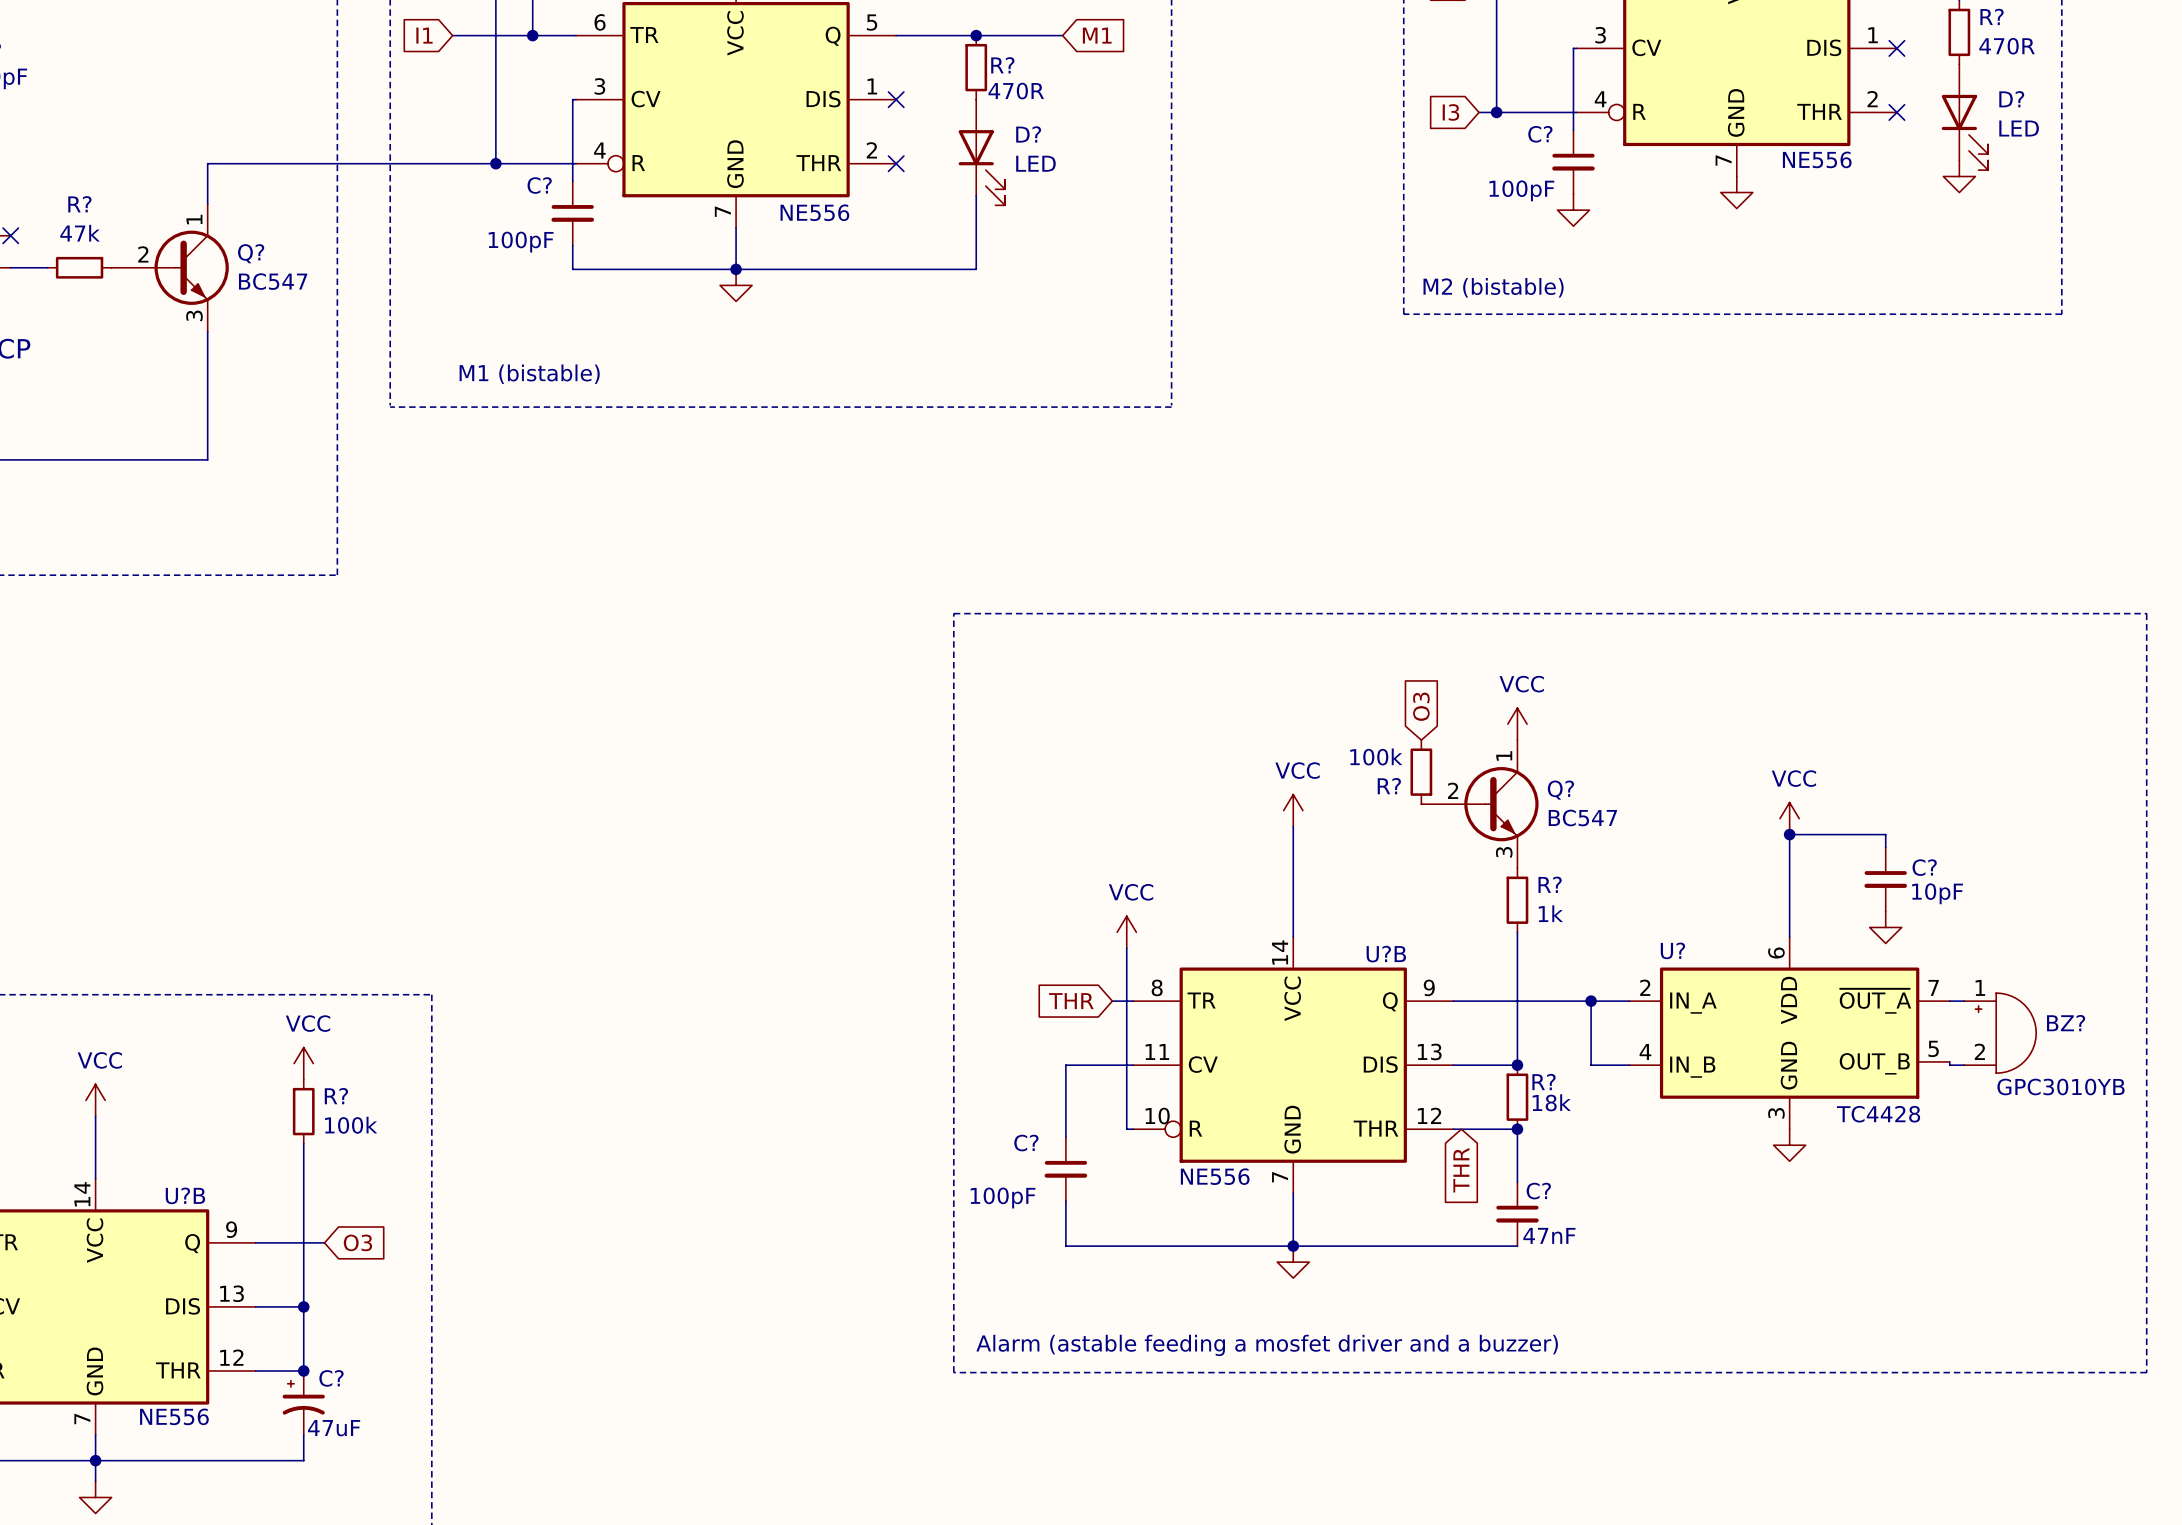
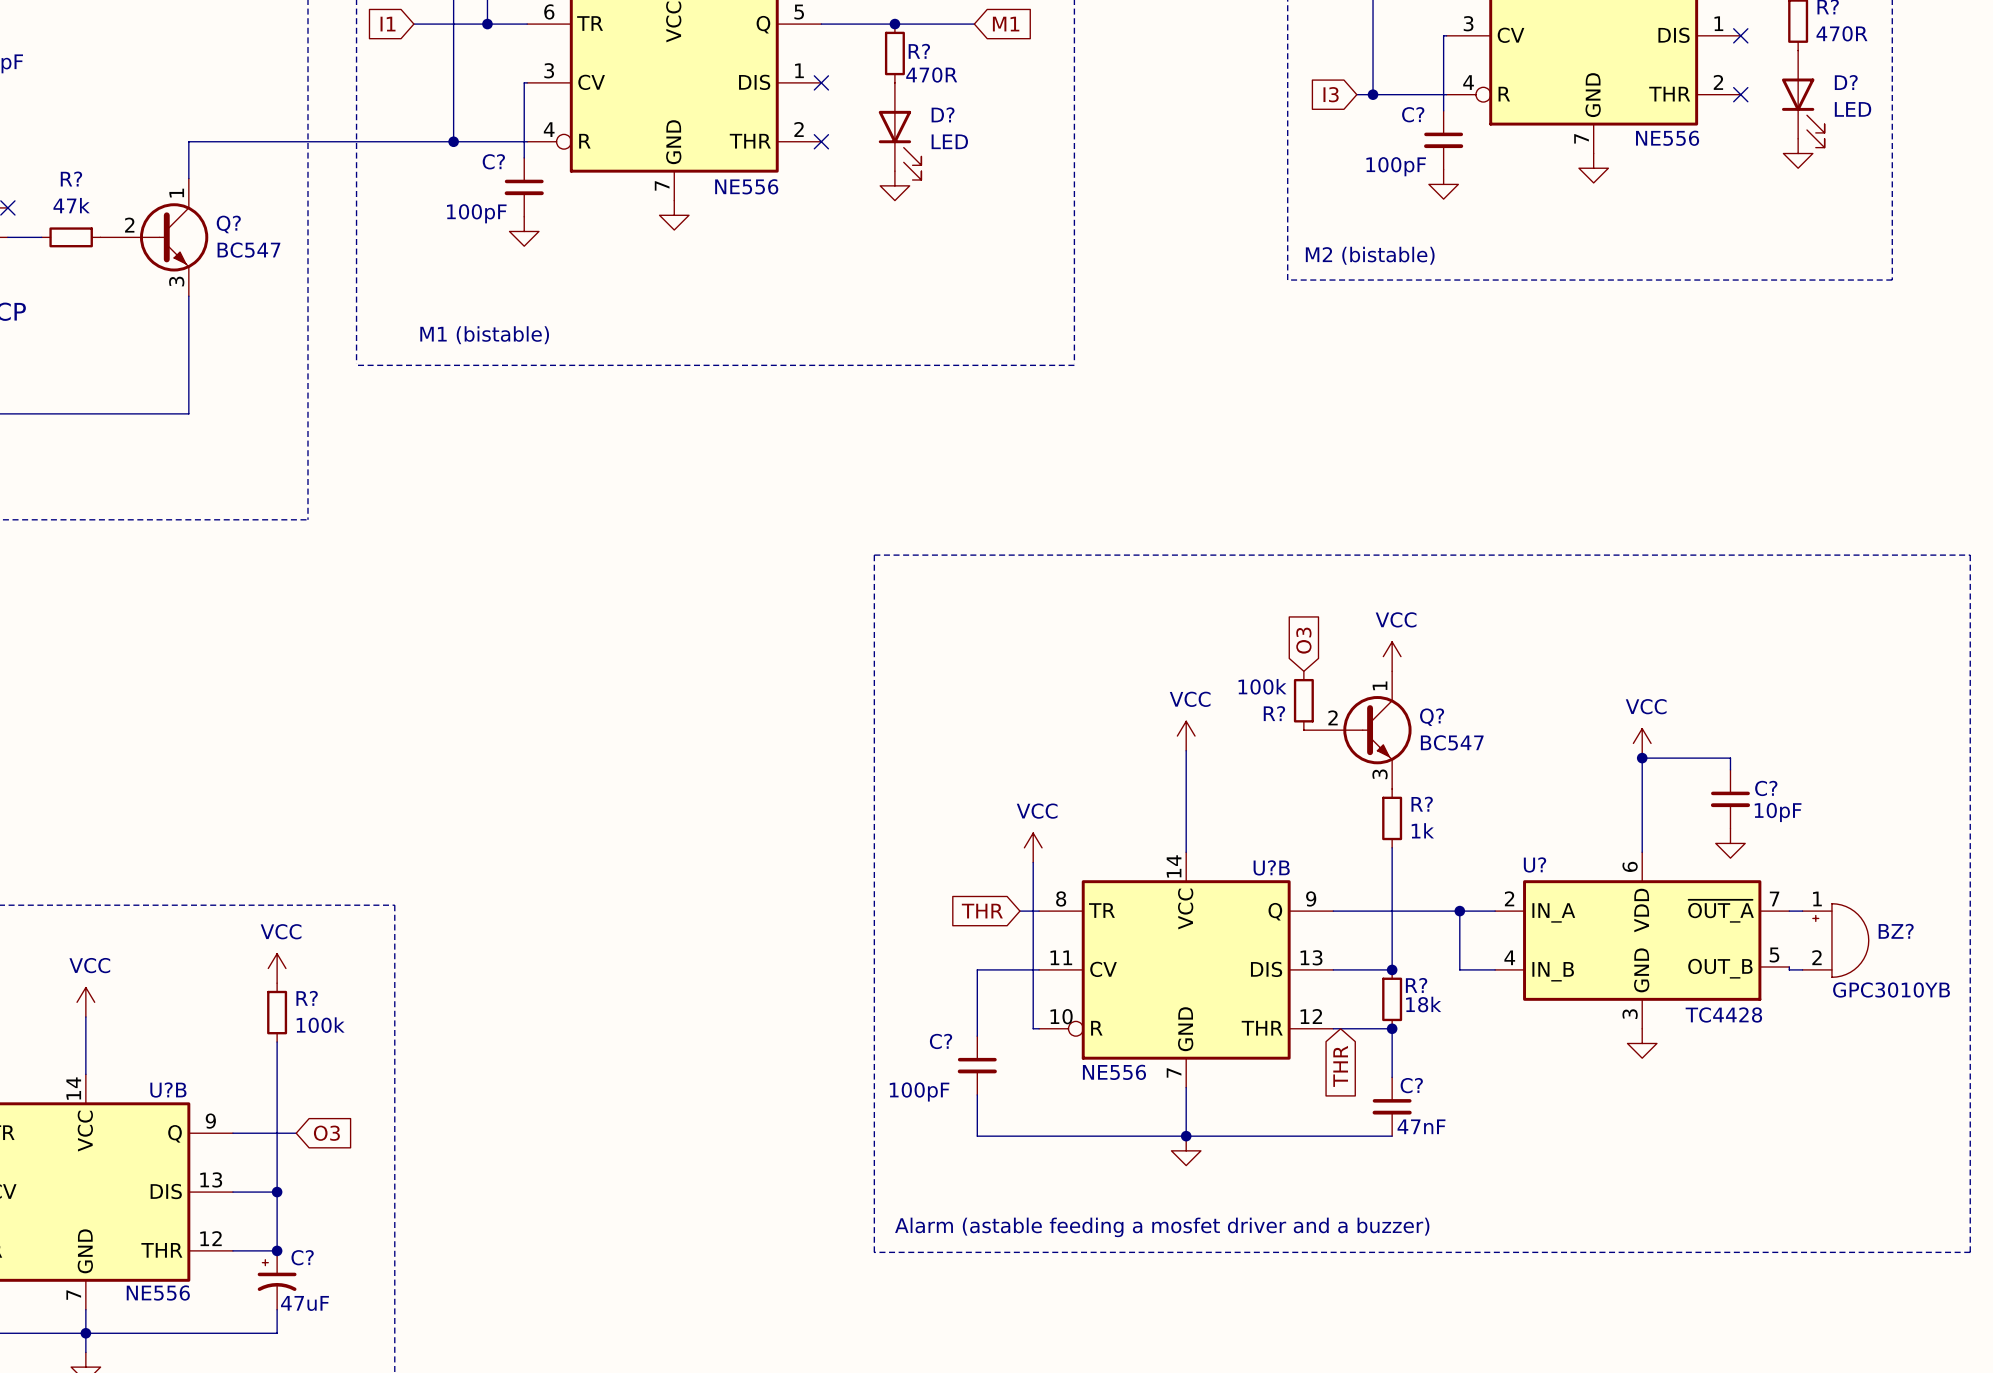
wire: (976, 195) (976, 269) (572, 269) (572, 245) -> none
power symbol: none -> (894, 185)
wire: (736, 227) (736, 269) -> none
power symbol: none -> (524, 231)
junction: (736, 269) -> none
power symbol position: (736, 285) -> (674, 215)

